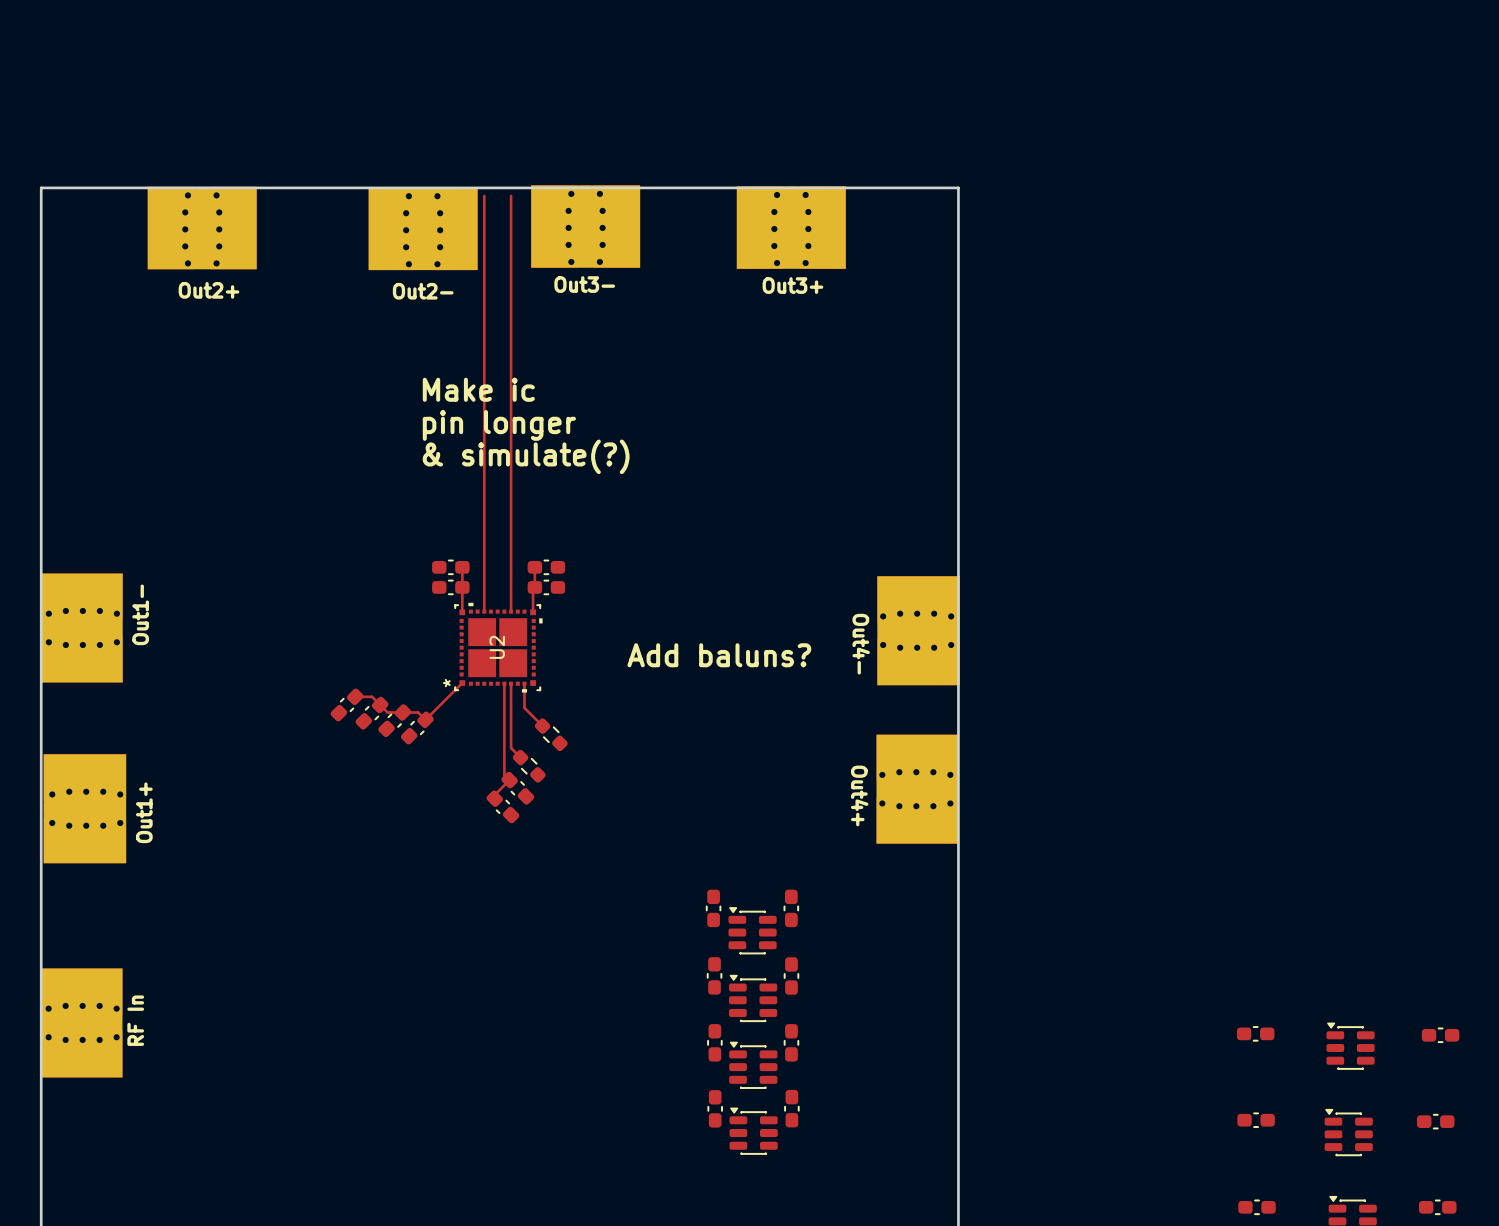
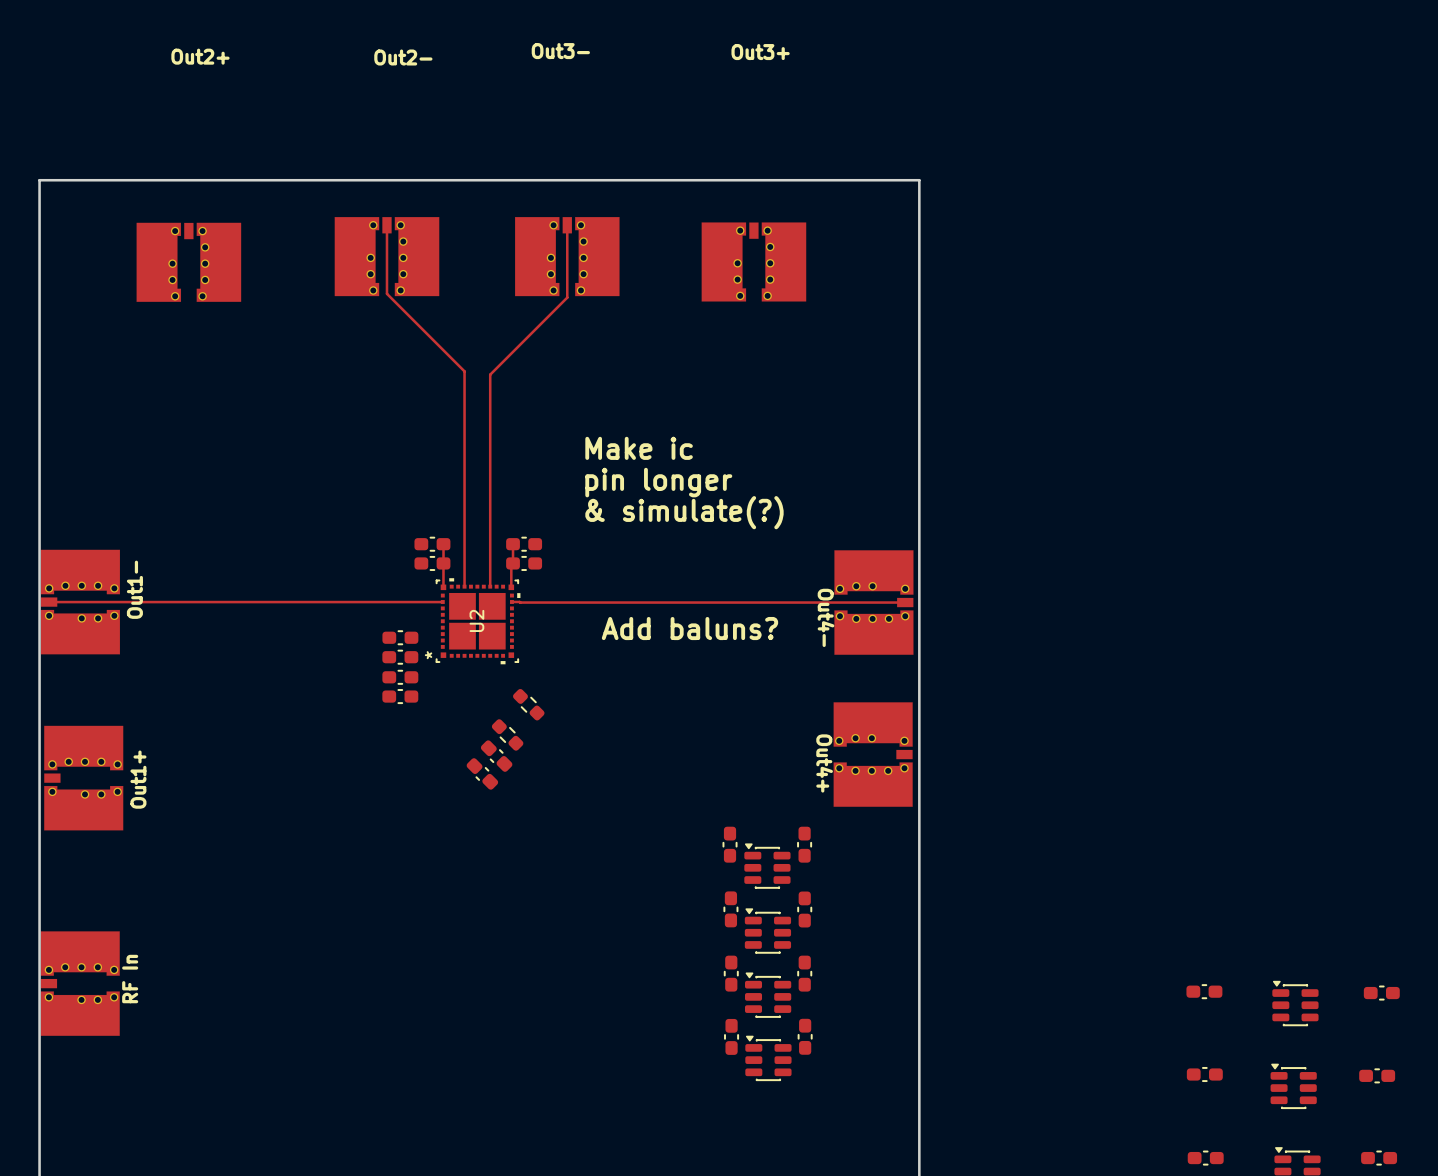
track: (484, 195) (484, 387) -> (386, 225) (386, 293) (464, 371)
track: (511, 195) (511, 390) -> (567, 225) (567, 297) (490, 374)
part: (585, 226) -> none
part: (791, 227) -> none
part: (202, 228) -> none
part: (423, 228) -> none
part: none -> (386, 256)
part: none -> (567, 256)
part: none -> (188, 262)
part: none -> (753, 261)
text position: Out3- (584, 284) -> Out3- (560, 51)
text position: Out3+ (792, 285) -> Out3+ (760, 52)
text position: Out2+ (208, 290) -> Out2+ (200, 56)
text position: Out2- (423, 291) -> Out2- (403, 57)
text position: Make ic (478, 389) -> Make ic (639, 448)
text position: pin longer (499, 425) -> pin longer (658, 482)
text position: & simulate(?) (526, 456) -> & simulate(?) (684, 512)
part footprint: [40, 573, 123, 683] -> [40, 549, 120, 655]
part footprint: [877, 576, 960, 686] -> [834, 550, 914, 655]
track: none -> (49, 602) (442, 602)
track: none -> (511, 601) (905, 602)
part: none -> (400, 637)
track: (462, 683) (425, 719) (418, 712) (387, 712) (371, 696) (355, 696) -> none
track: (504, 683) (504, 774) (509, 780) (494, 794) (494, 798) -> none
track: (511, 683) (511, 748) (520, 757) -> none
track: (524, 683) (524, 707) (542, 726) -> none
part: none -> (400, 657)
part: (347, 704) -> none
part: none -> (400, 677)
part: (371, 713) -> none
part: (394, 720) -> none
part rotation: 0° (417, 728) -> 45° clockwise (400, 696)
part footprint: [876, 734, 959, 844] -> [833, 702, 913, 807]
part footprint: [43, 754, 127, 864] -> [44, 725, 124, 831]
part: none -> (730, 844)
part: none -> (804, 844)
part footprint: [783, 889, 799, 928] -> [744, 843, 791, 889]
part: (713, 908) -> none
part: (752, 930) -> none
part: none -> (730, 909)
part: none -> (804, 909)
part footprint: [783, 957, 800, 995] -> [744, 908, 792, 954]
part footprint: [40, 968, 123, 1078] -> [40, 931, 120, 1036]
part: (714, 975) -> none
part: (753, 998) -> none
part: none -> (731, 973)
part: none -> (804, 973)
part footprint: [783, 1024, 800, 1062] -> [744, 972, 792, 1018]
part: (714, 1042) -> none
part: (753, 1065) -> none
part: none -> (805, 1036)
part: none -> (731, 1036)
part footprint: [784, 1089, 800, 1128] -> [745, 1035, 792, 1081]
part: (715, 1108) -> none
part: (753, 1131) -> none

